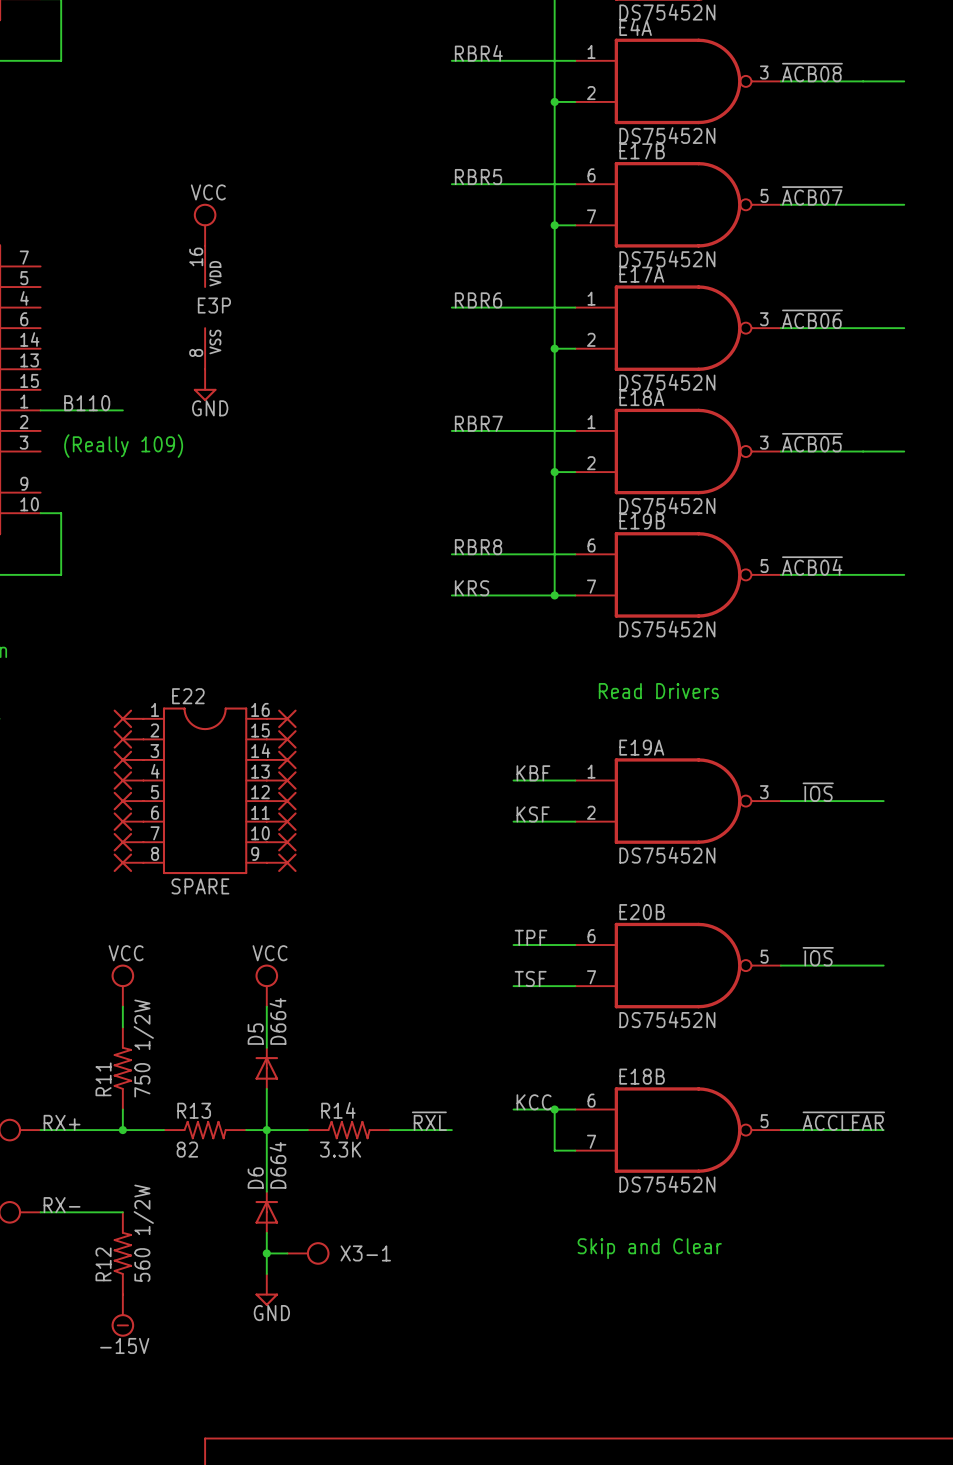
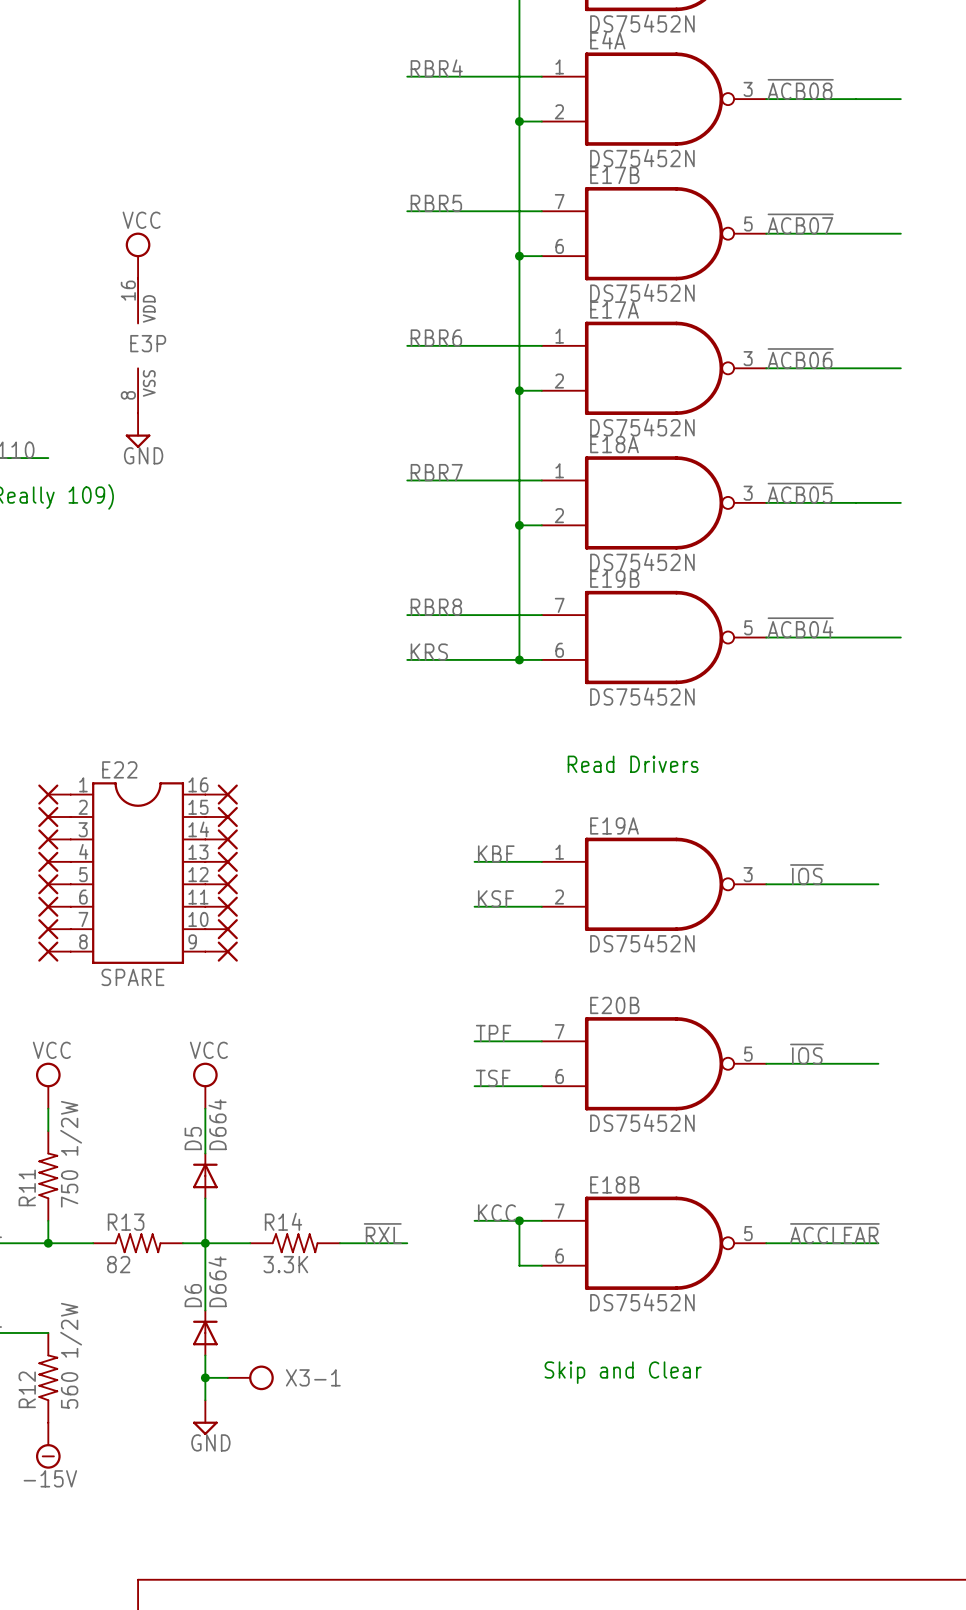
E17B flip: as is (678, 204) -> up-down (654, 233)
E19B flip: as is (678, 574) -> up-down (654, 637)
E20B flip: as is (678, 965) -> up-down (654, 1063)
E18B flip: as is (678, 1130) -> up-down (654, 1243)

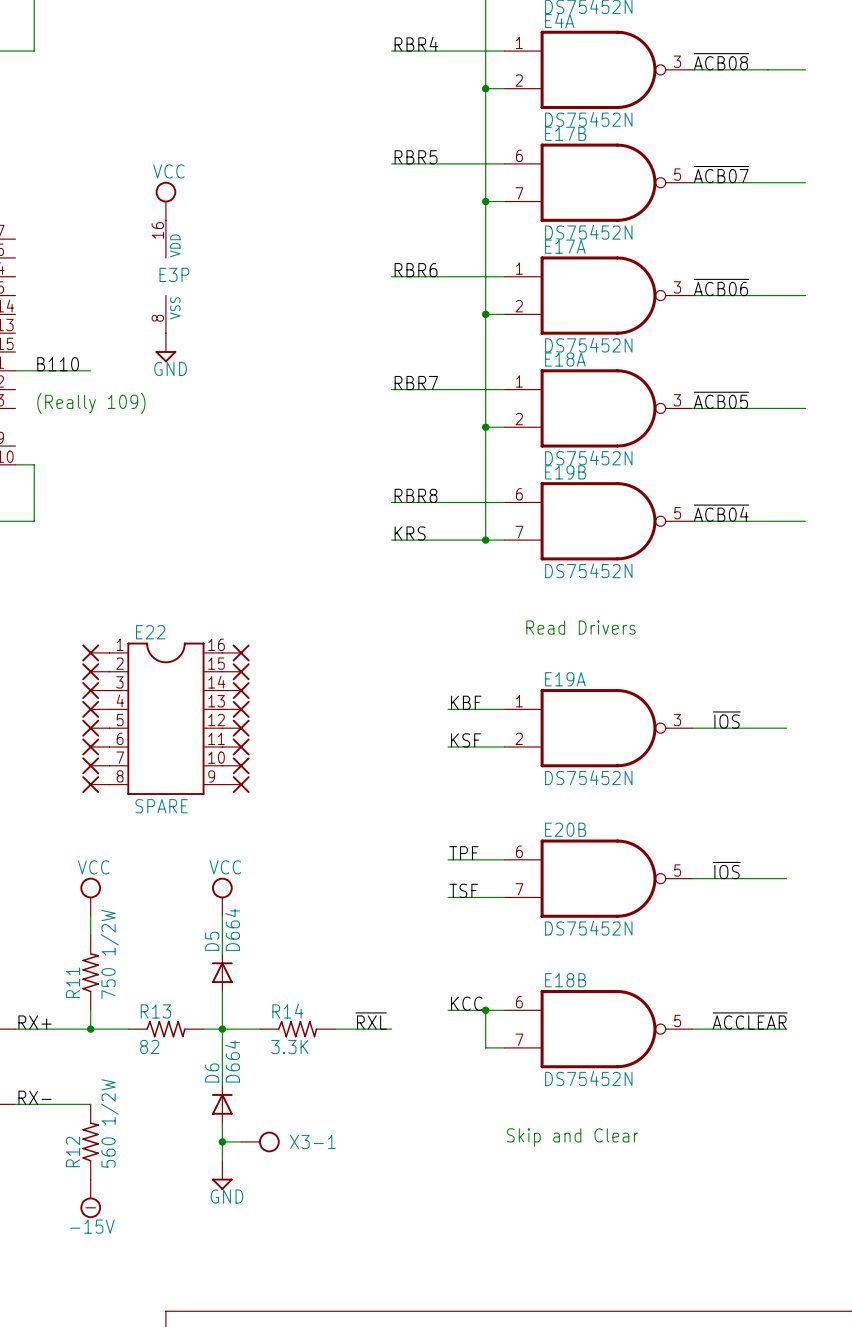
E17B flip: as is (654, 233) -> up-down (598, 182)
E19B flip: as is (654, 637) -> up-down (598, 521)
E20B flip: as is (654, 1063) -> up-down (598, 878)
E18B flip: as is (654, 1243) -> up-down (598, 1029)

